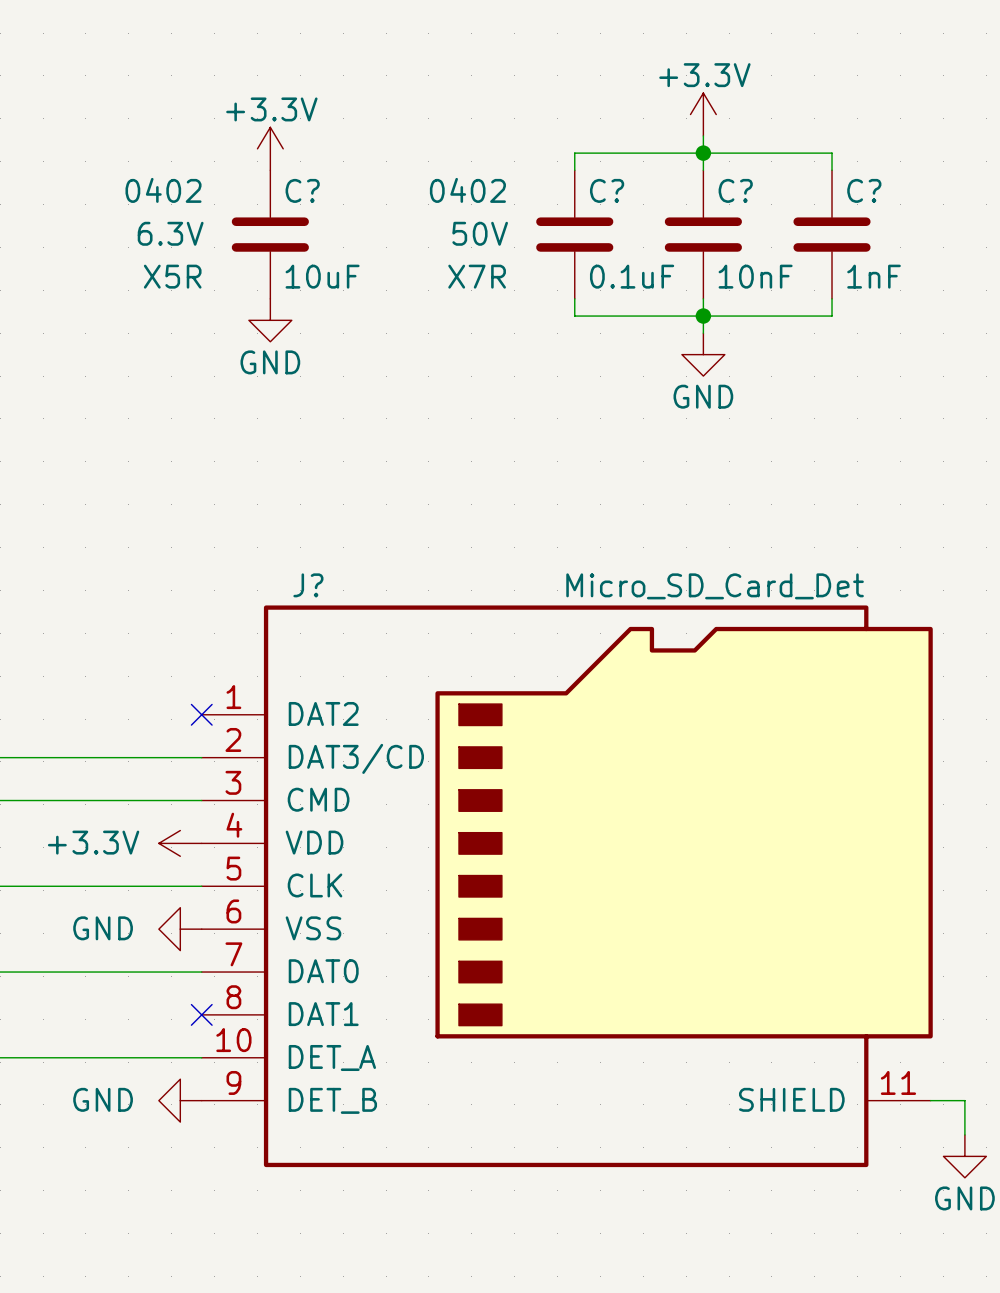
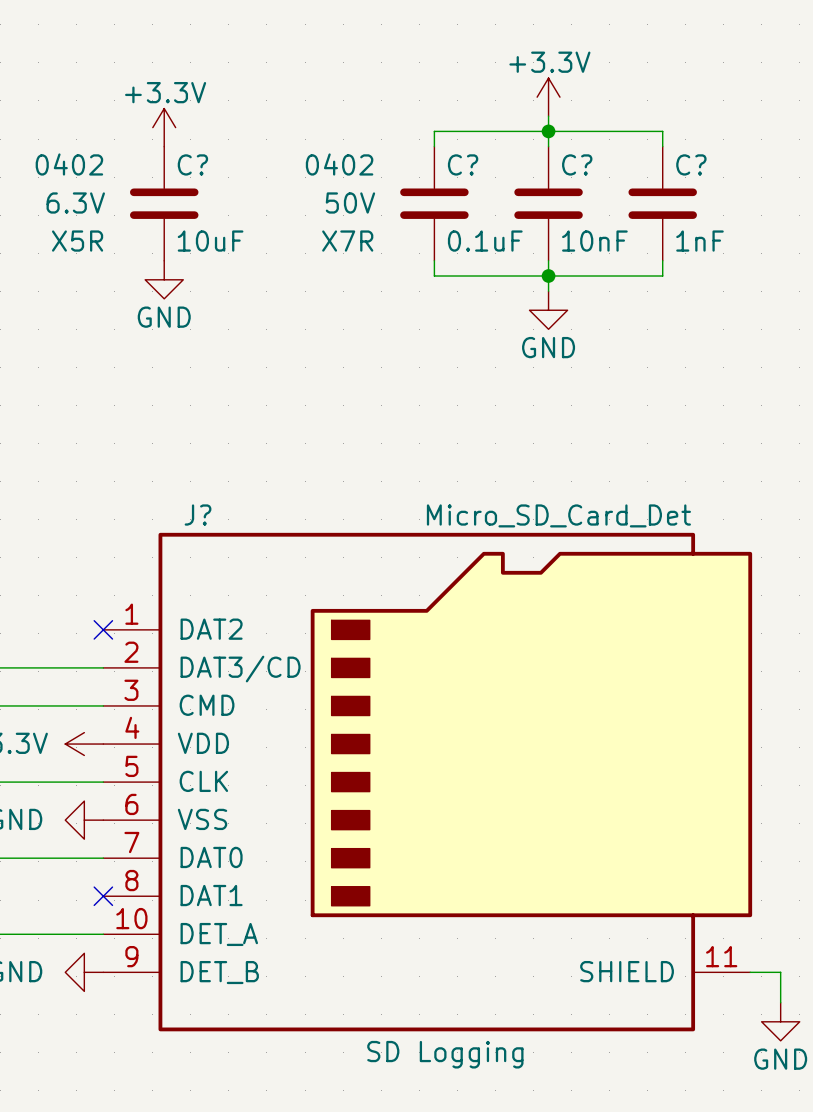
J? text: none -> SD Logging (445, 1054)

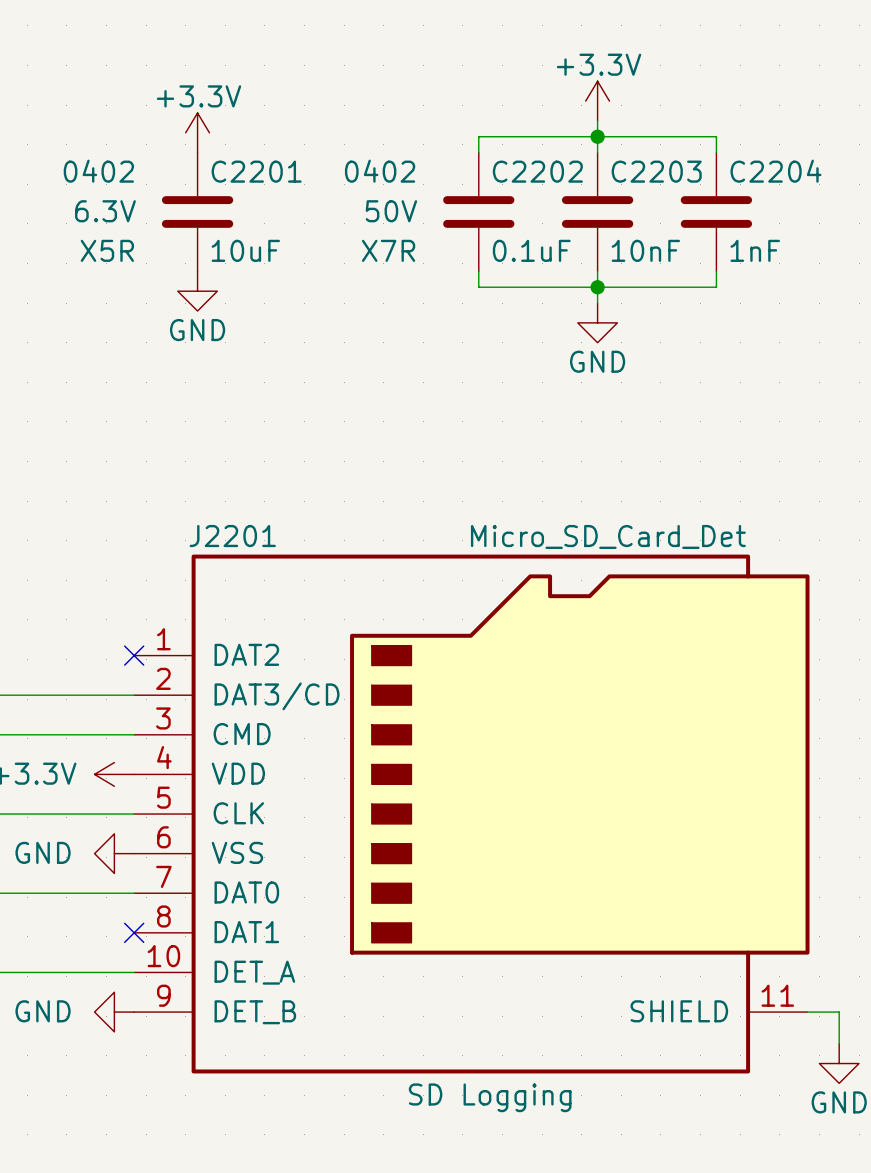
C? name: C? (192, 164) -> C2201 (256, 171)
C? name: C? (463, 164) -> C2202 (537, 171)
C? name: C? (577, 164) -> C2203 (656, 171)
C? name: C? (691, 164) -> C2204 (775, 171)
J? name: J? (198, 515) -> J2201 (232, 536)

